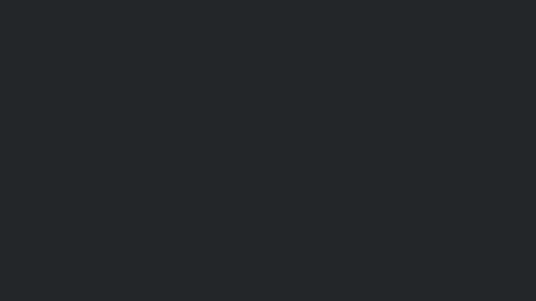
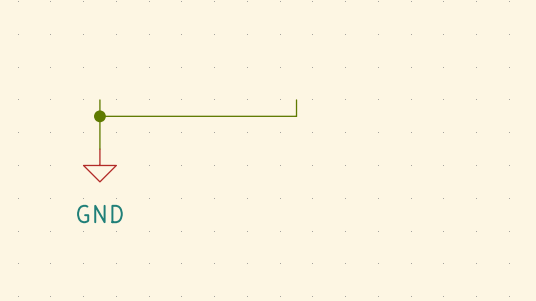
wire: none -> (99, 99) (99, 149)
wire: none -> (296, 99) (296, 116) (99, 116)
junction: none -> (99, 116)
power symbol: none -> GND (99, 165)

